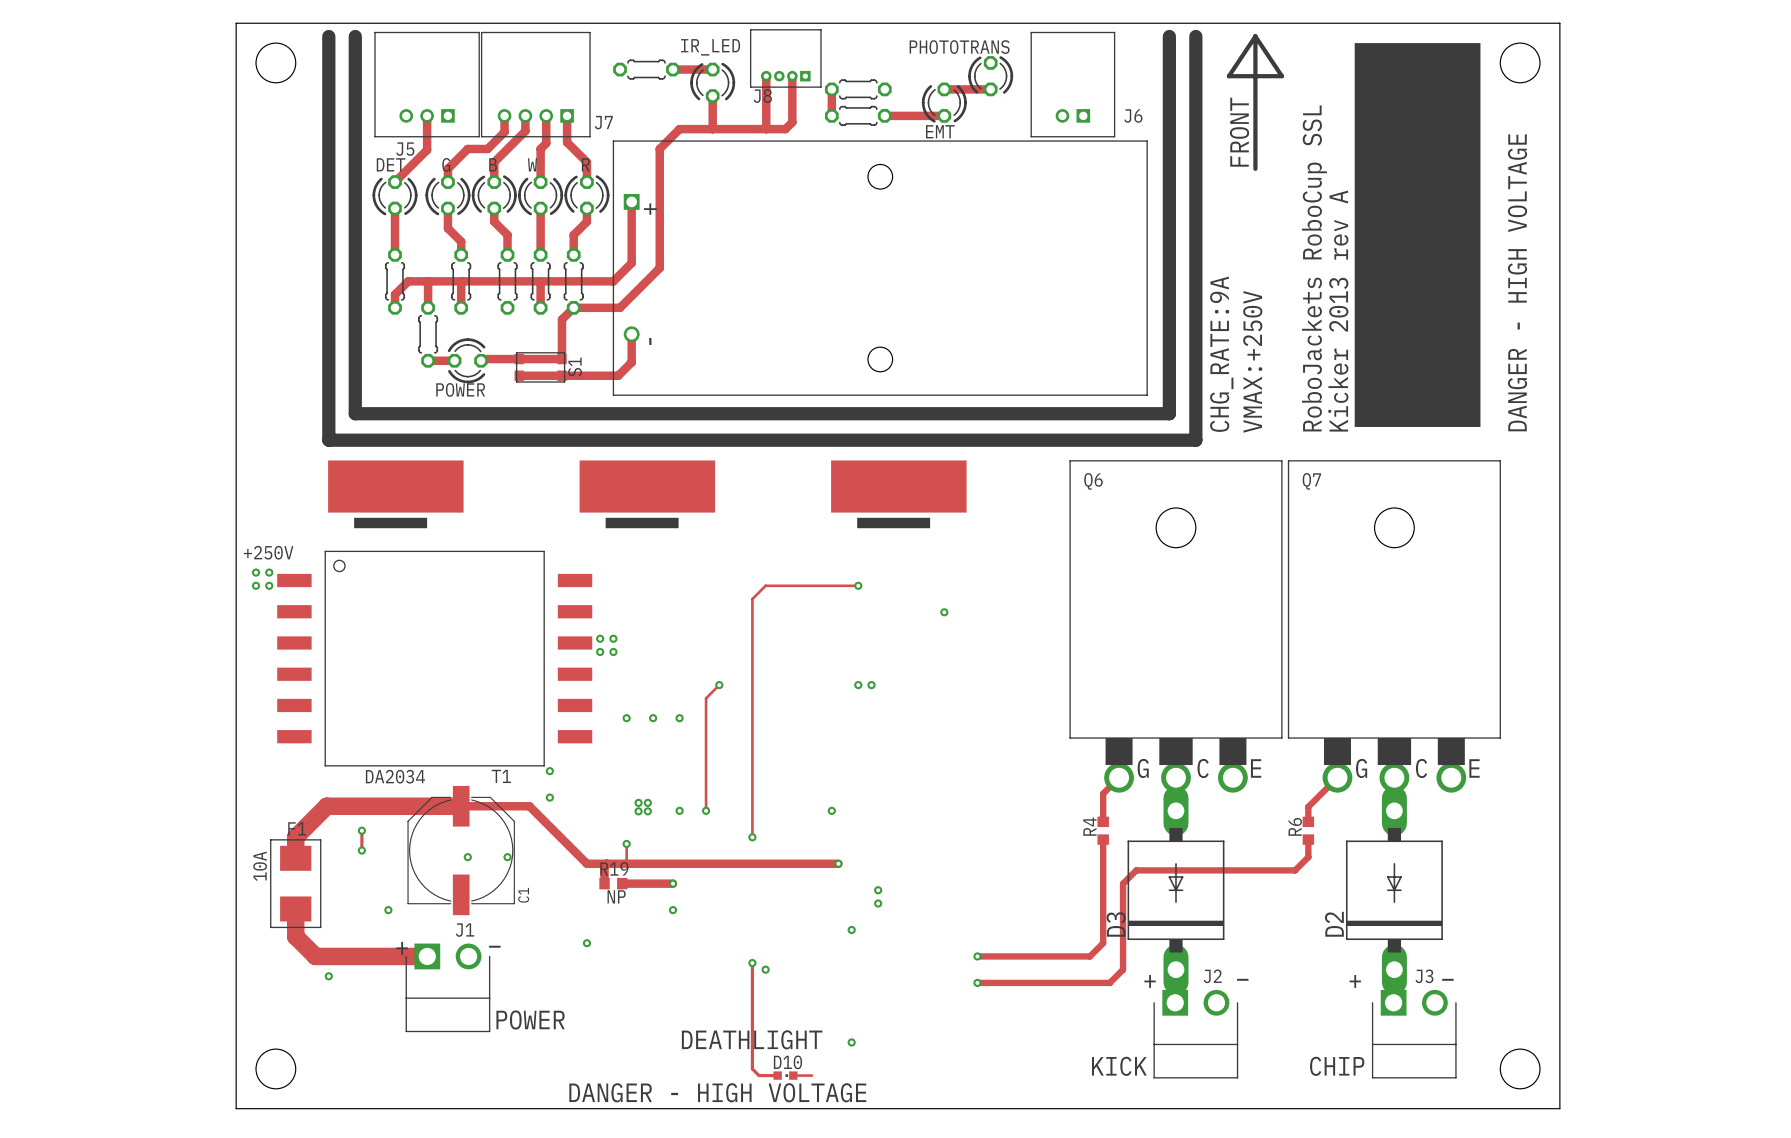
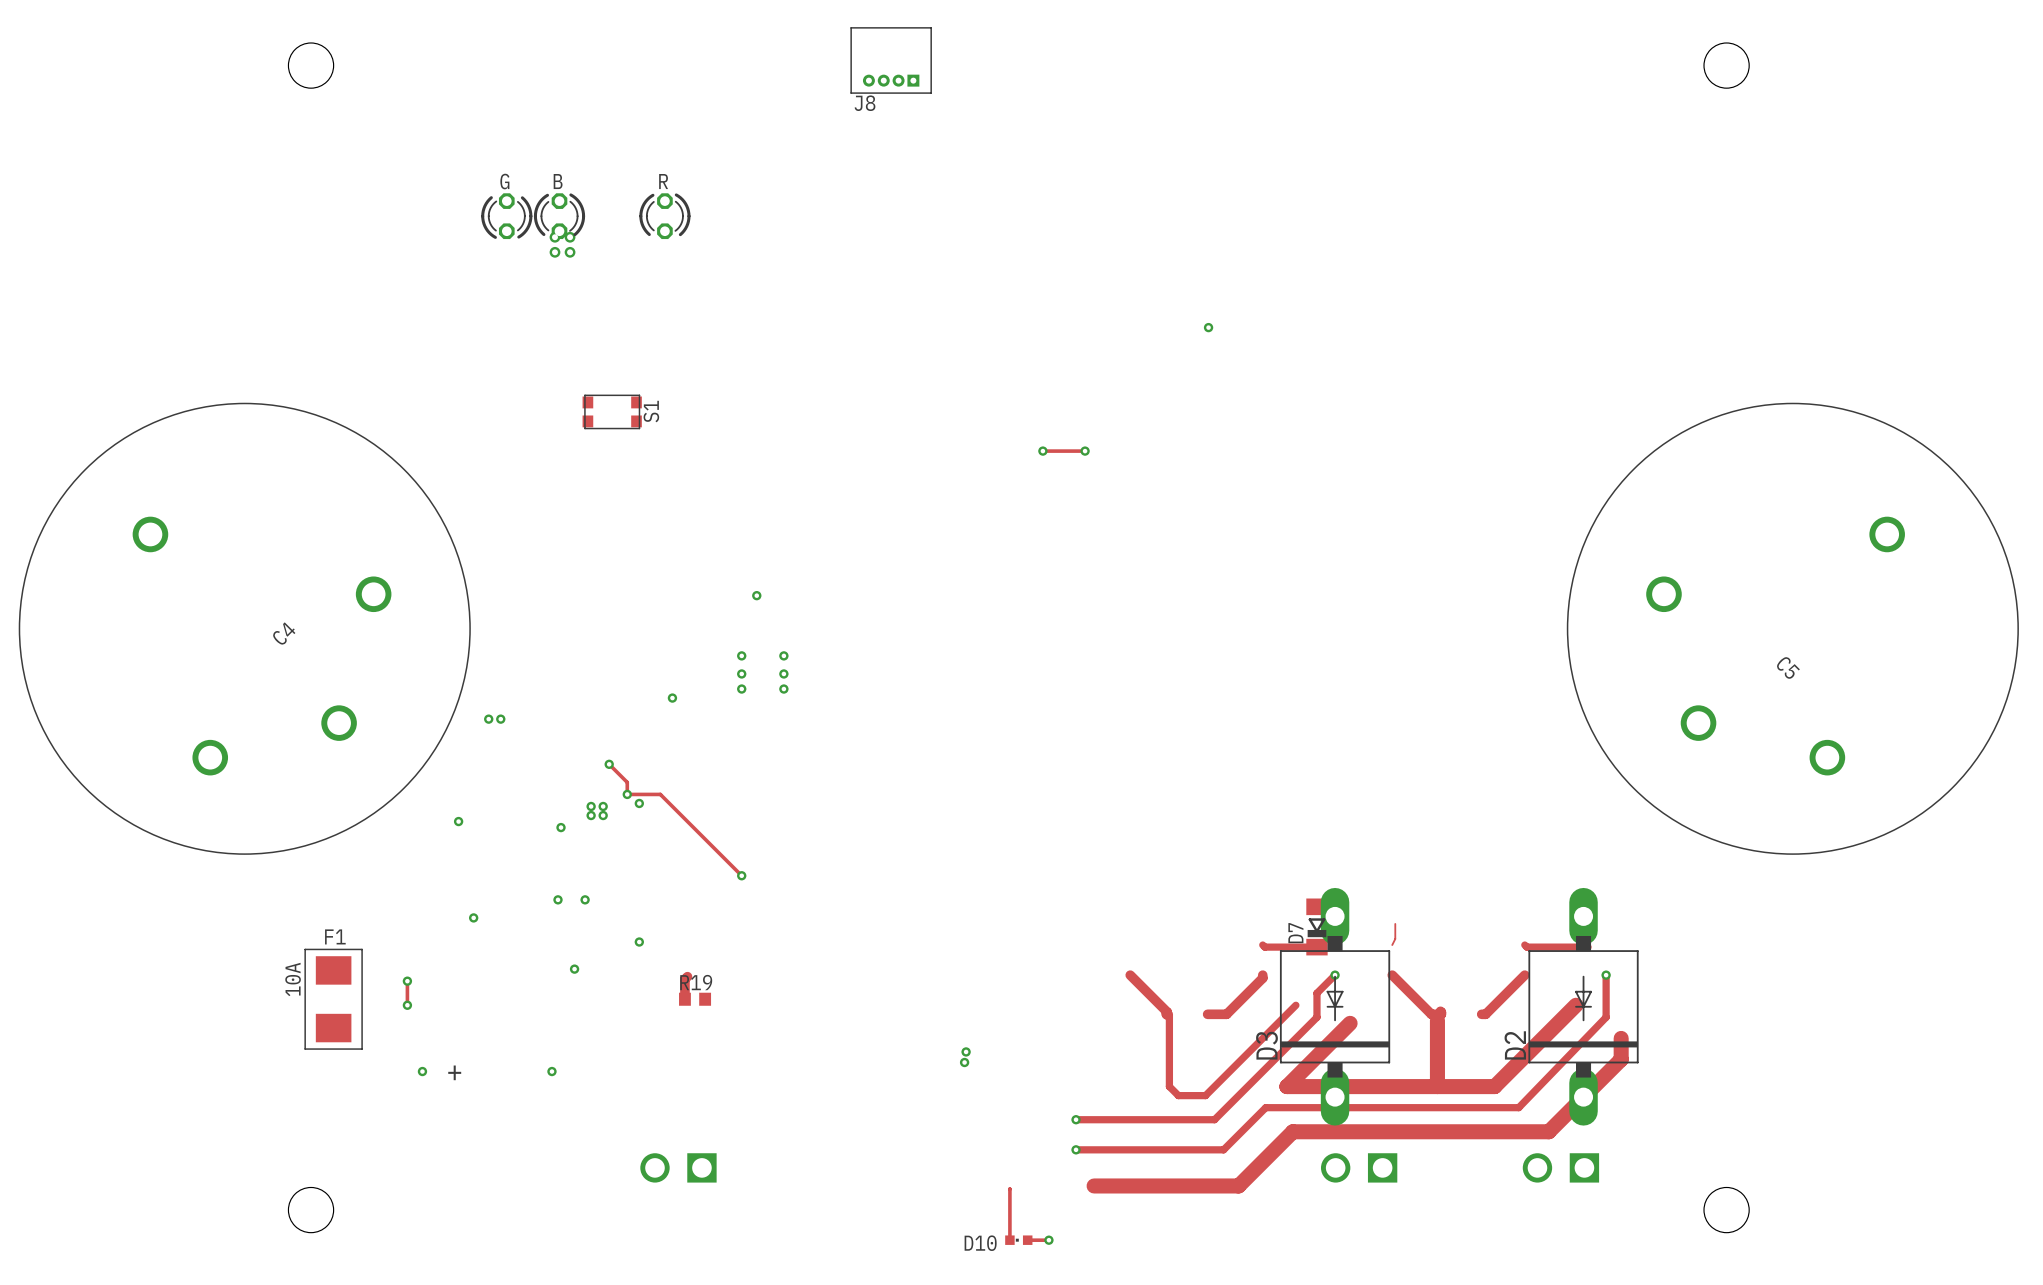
board edge: (236, 23) (1559, 23) (1559, 1108) (236, 1108) (236, 23) -> none
line: (328, 36) (328, 440) (1195, 440) (1195, 36) -> none
line: (355, 36) (355, 413) (1169, 413) (1169, 36) -> none
line: (1255, 36) (1255, 168) -> none
line: (1255, 36) (1228, 76) (1281, 76) (1255, 36) -> none
drawing: [1354, 43, 1481, 427] -> none
part: (646, 69) -> none
track: (672, 69) (712, 69) -> none
track: (766, 76) (766, 129) -> none
track: (792, 76) (792, 122) (785, 129) (679, 129) (659, 148) (659, 268) (620, 307) (573, 307) (561, 319) (561, 359) (482, 359) (481, 360) -> none
PHOTOTRANS: (990, 76) -> none
IR_LED: (712, 82) -> none
J5: (427, 84) -> none
J7: (535, 84) -> none
J6: (1072, 84) -> none
track: (831, 89) (831, 115) -> none
part: (858, 89) -> none
track: (944, 89) (990, 89) -> none
track: (712, 96) (712, 129) -> none
EMT: (944, 102) -> none
track: (427, 115) (427, 149) (395, 182) -> none
track: (504, 115) (504, 132) (487, 148) (467, 148) (447, 168) (447, 182) -> none
track: (525, 115) (525, 131) (494, 162) (494, 182) -> none
track: (546, 115) (546, 143) (540, 148) (540, 182) -> none
track: (567, 115) (567, 142) (586, 162) (586, 182) -> none
part: (858, 115) -> none
track: (884, 115) (944, 115) -> none
text: FRONT (1239, 132) -> none
DET: (395, 195) -> none
W: (540, 195) -> none
track: (631, 201) (631, 263) (613, 281) (408, 281) (395, 294) (395, 307) -> none
track: (395, 208) (395, 254) -> none
track: (447, 208) (447, 228) (461, 241) (461, 254) -> none
track: (494, 208) (494, 221) (507, 235) (507, 254) -> none
track: (540, 208) (540, 254) -> none
track: (586, 208) (586, 221) (573, 235) (573, 254) -> none
via: none -> (554, 237)
via: none -> (570, 237)
via: none -> (554, 252)
via: none -> (570, 252)
part: (880, 268) -> none
text: RoboJackets RoboCup SSL (1314, 268) -> none
part: (395, 281) -> none
track: (428, 281) (428, 307) -> none
track: (461, 281) (461, 307) -> none
part: (461, 281) -> none
part: (507, 281) -> none
track: (540, 281) (540, 307) -> none
part: (540, 281) -> none
part: (573, 281) -> none
text: DANGER - HIGH VOLTAGE (1517, 282) -> none
via: none -> (1208, 327)
text: Kicker 2013 rev A (1338, 311) -> none
part: (428, 334) -> none
track: (631, 334) (631, 362) (618, 375) (519, 375) -> none
text: CHG_RATE:9A (1221, 354) -> none
track: (428, 360) (454, 360) -> none
POWER: (467, 360) -> none
text: VMAX:+250V (1252, 361) -> none
track: none -> (1042, 451) (1085, 451)
via: none -> (1042, 451)
via: none -> (1085, 451)
part: (395, 494) -> none
part: (647, 494) -> none
part: (898, 494) -> none
via: none -> (756, 595)
text: +250V (268, 552) -> none
C4: none -> (244, 628)
C5: none -> (1792, 628)
via: (256, 572) -> none
via: (269, 572) -> none
via: none -> (741, 655)
via: none -> (783, 655)
via: (256, 585) -> none
via: (269, 585) -> none
track: (858, 585) (765, 585) (752, 599) (752, 837) -> none
via: (858, 585) -> none
via: none -> (741, 673)
via: none -> (783, 673)
via: none -> (741, 689)
via: none -> (783, 689)
via: (944, 612) -> none
via: none -> (672, 698)
Q6: (1175, 626) -> none
Q7: (1394, 626) -> none
via: none -> (488, 719)
via: none -> (500, 719)
via: (600, 638) -> none
via: (613, 638) -> none
via: (600, 651) -> none
via: (613, 651) -> none
T1: DA2034 (434, 658) -> none
track: none -> (609, 764) (627, 782) (627, 794) (660, 794) (741, 875)
via: none -> (609, 764)
track: (719, 685) (706, 698) (706, 810) -> none
via: (719, 685) -> none
via: (858, 685) -> none
via: (871, 685) -> none
via: none -> (627, 794)
via: none -> (639, 803)
via: none -> (591, 806)
via: none -> (603, 806)
via: (626, 718) -> none
via: (653, 718) -> none
via: (679, 718) -> none
via: none -> (591, 815)
via: none -> (603, 815)
via: none -> (458, 821)
via: none -> (561, 827)
text: G (1143, 768) -> none
text: C (1203, 768) -> none
text: E (1256, 768) -> none
text: G (1361, 768) -> none
text: C (1421, 768) -> none
text: E (1474, 768) -> none
via: (549, 771) -> none
via: none -> (741, 875)
track: (1119, 777) (1103, 793) (1103, 821) -> none
track: (1337, 777) (1308, 806) (1308, 821) -> none
via: none -> (558, 899)
via: none -> (585, 899)
via: (549, 797) -> none
via: (638, 802) -> none
via: (647, 802) -> none
via: (679, 810) -> none
via: (706, 810) -> none
via: (831, 810) -> none
via: (638, 811) -> none
via: (647, 811) -> none
via: none -> (473, 917)
track: none -> (1395, 923) (1395, 939) (1392, 945)
D7: none -> (1316, 926)
track: (361, 830) (361, 850) -> none
via: (361, 830) -> none
R4: (1103, 830) -> none
R6: (1308, 830) -> none
via: none -> (639, 942)
track: none -> (1262, 945) (1264, 947) (1316, 947)
track: none -> (1524, 945) (1526, 947) (1588, 947)
via: (752, 837) -> none
track: (1103, 839) (1103, 943) (1089, 956) (977, 956) -> none
track: (1308, 839) (1308, 857) (1295, 870) (1136, 870) (1123, 883) (1123, 969) (1109, 982) (977, 982) -> none
track: (626, 843) (626, 863) -> none
via: (626, 843) -> none
via position: (361, 850) -> (407, 981)
C1: (461, 850) -> none
via: (467, 857) -> none
track: (295, 858) (295, 837) (326, 806) (529, 806) (586, 863) (838, 863) -> none
track: none -> (1130, 975) (1167, 1012) (1166, 1014)
track: none -> (1262, 975) (1262, 978) (1226, 1014) (1207, 1014)
track: none -> (1335, 975) (1316, 993) (1316, 1017) (1214, 1119) (1076, 1119)
via: none -> (1335, 975)
track: none -> (1392, 975) (1431, 1014) (1441, 1014) (1440, 1011)
track: none -> (1524, 975) (1485, 1014) (1481, 1014)
track: none -> (1606, 975) (1606, 1017) (1518, 1107) (1265, 1107) (1223, 1149) (1076, 1149)
via: none -> (1606, 975)
via: (838, 863) -> none
track: none -> (407, 981) (407, 1005)
track: (622, 883) (672, 883) -> none
via: (672, 883) -> none
via: none -> (407, 1005)
track: none -> (1295, 1005) (1205, 1095) (1178, 1095) (1169, 1086) (1169, 1014) (1166, 1014)
track: none -> (1576, 1005) (1494, 1086) (1286, 1086) (1350, 1023)
via: (878, 890) -> none
text: NP (616, 896) -> none
track: none -> (1440, 1014) (1437, 1017) (1437, 1086)
via: (878, 903) -> none
track: (295, 908) (295, 936) (315, 956) (427, 956) -> none
via: (388, 910) -> none
via: (672, 910) -> none
track: none -> (1621, 1038) (1621, 1059) (1548, 1131) (1292, 1131) (1238, 1185) (1094, 1185)
via: none -> (964, 1062)
via: (586, 943) -> none
text: _ (494, 946) -> none
via: none -> (422, 1071)
via: none -> (551, 1071)
via: (977, 956) -> none
track: (752, 963) (752, 1068) (759, 1075) (777, 1075) -> none
via: (752, 963) -> none
via: (765, 969) -> none
via: (328, 976) -> none
text: _ (1242, 979) -> none
text: _ (1447, 979) -> none
text: + (1150, 981) -> none
text: + (1355, 981) -> none
via: (977, 982) -> none
J1 side: top (447, 987) -> bottom (678, 1167)
via: none -> (1076, 1119)
via: none -> (1076, 1149)
text: POWER (530, 1019) -> none
J2 side: top (1195, 1034) -> bottom (1560, 1167)
J3 side: top (1414, 1034) -> bottom (1359, 1167)
text: DEATHLIGHT (752, 1039) -> none
via: (851, 1042) -> none
track: none -> (1009, 1189) (1009, 1240)
D10 name position: D10 (787, 1062) -> D10 (980, 1243)
text: KICK (1119, 1066) -> none
text: CHIP (1337, 1066) -> none
D10 rotation: 0° (785, 1075) -> 180° (1018, 1240)
D10 position: (785, 1075) -> (1018, 1240)
track: (793, 1075) (811, 1075) -> (1027, 1240) (1048, 1240)
text: DANGER - HIGH VOLTAGE (717, 1092) -> none
via: none -> (1048, 1240)

